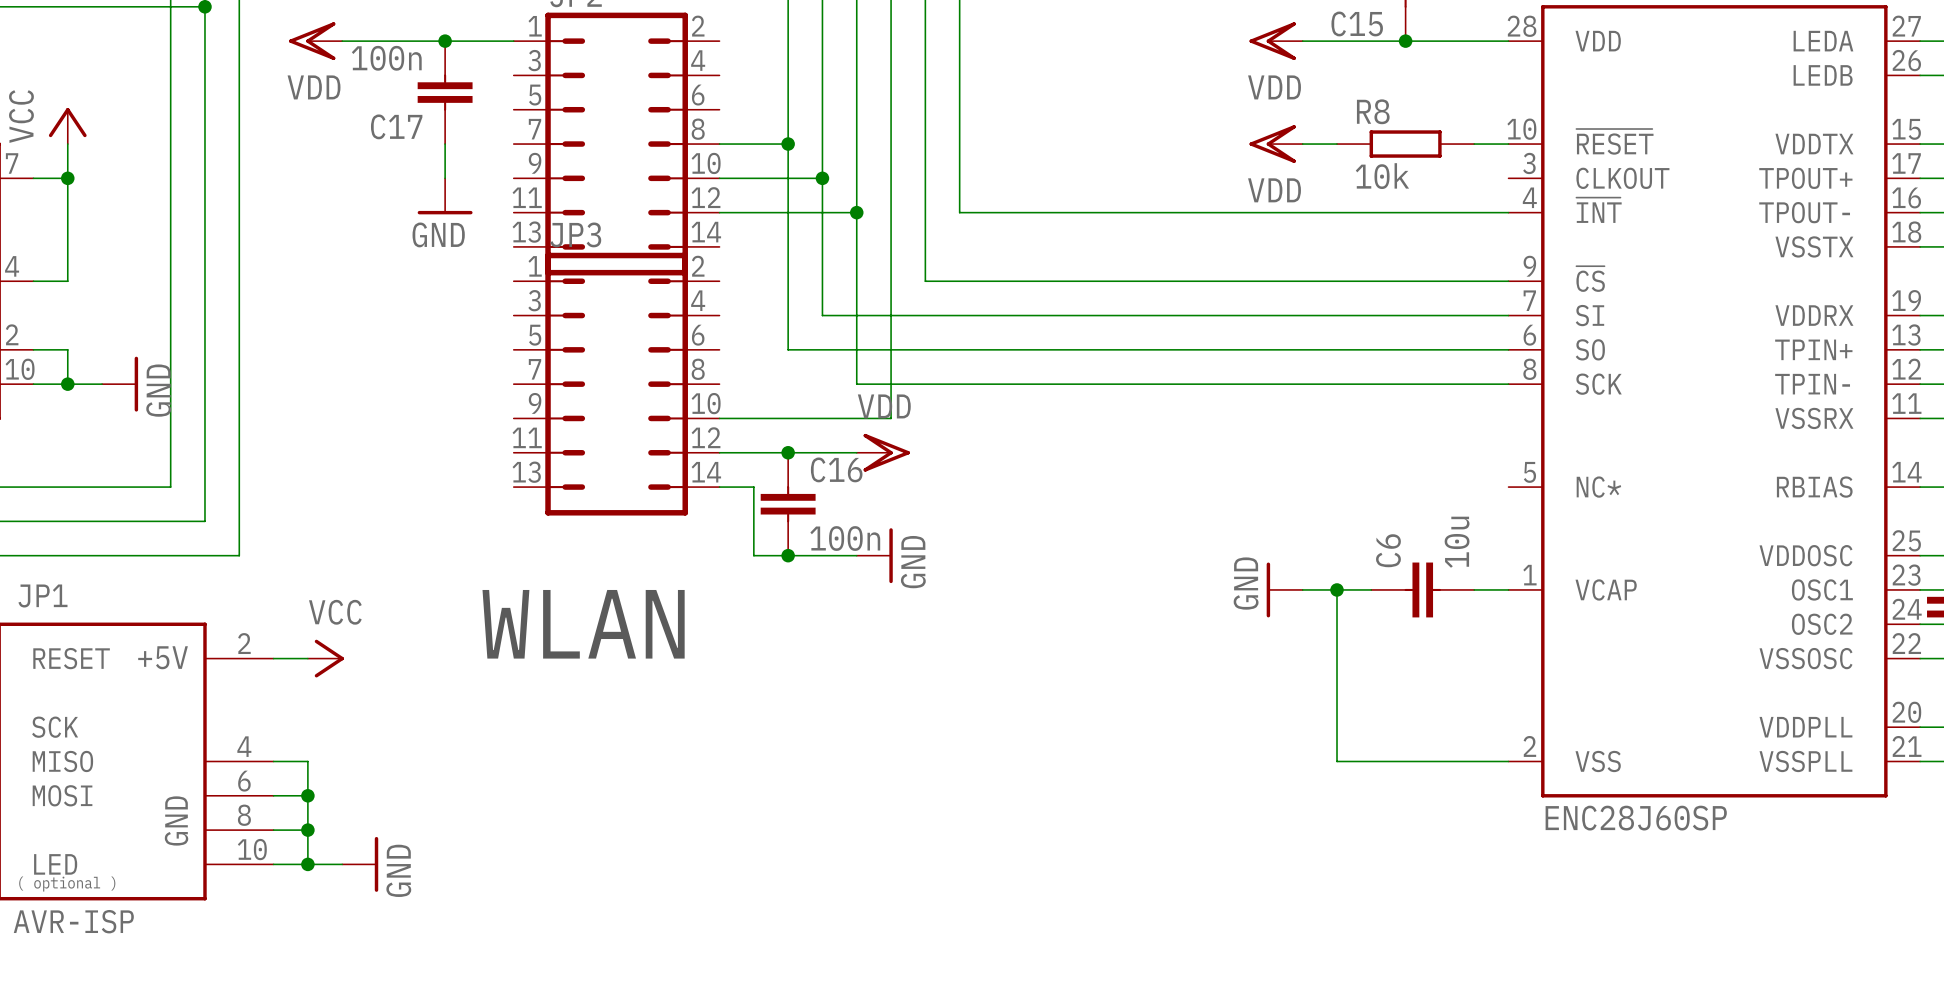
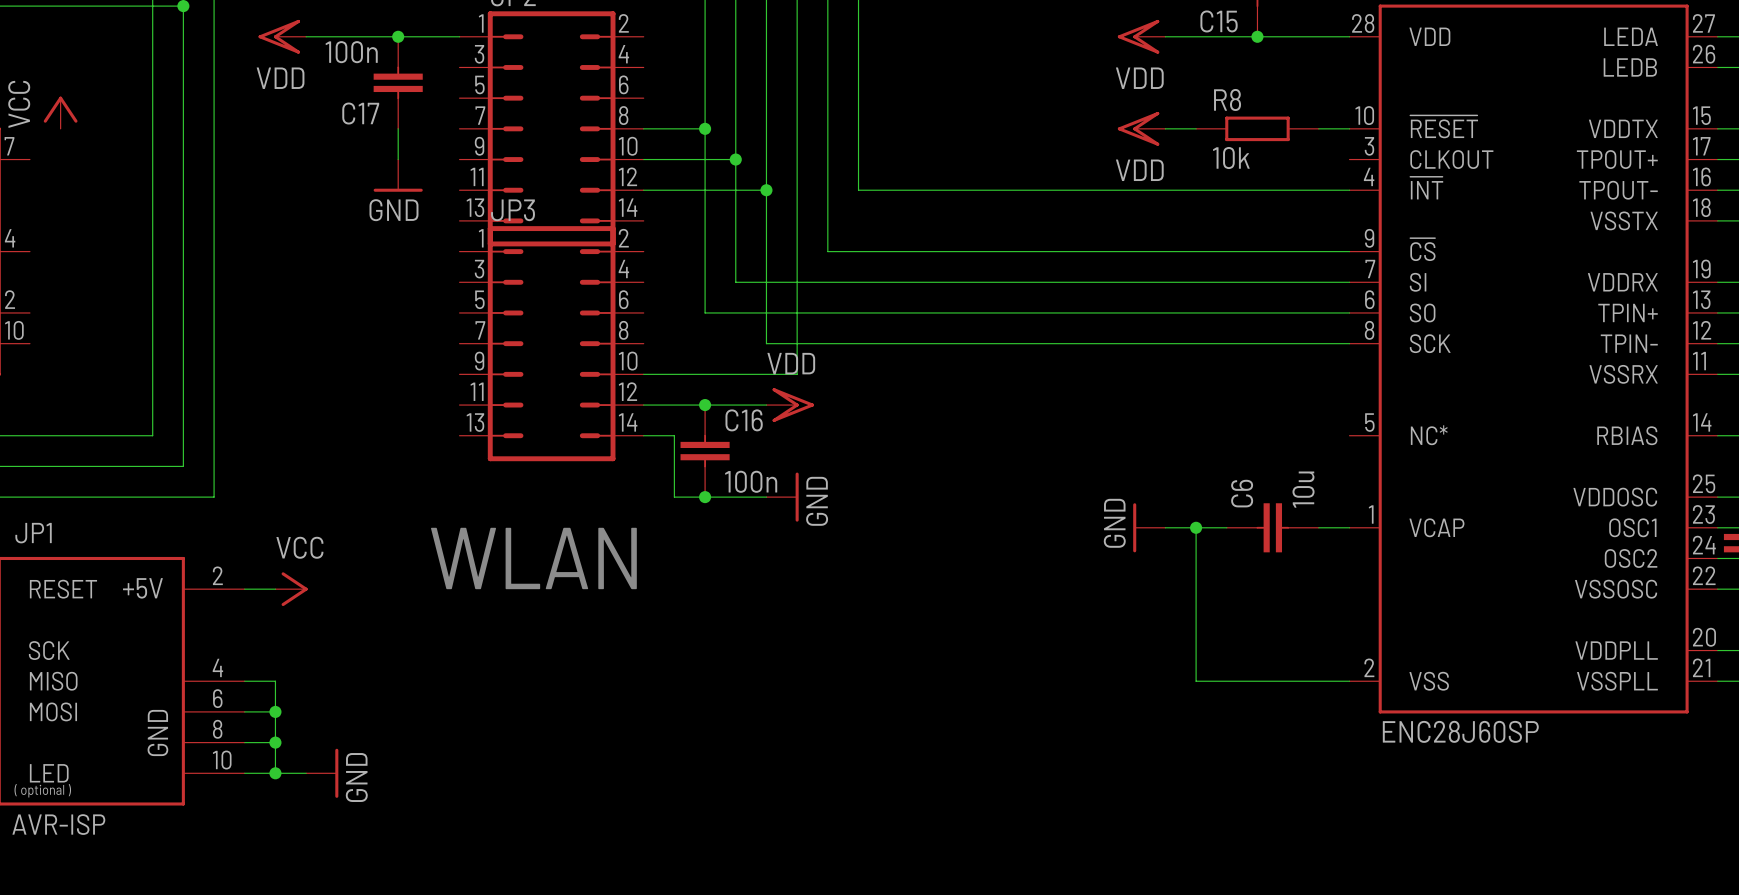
wire: (67, 144) (67, 281) (33, 281) -> none
wire: (33, 178) (67, 178) -> none
junction: (67, 178) -> none
wire: (33, 349) (67, 349) (67, 384) -> none
wire: (33, 384) (102, 384) -> none
junction: (67, 384) -> none
power symbol: GND (120, 384) -> none

